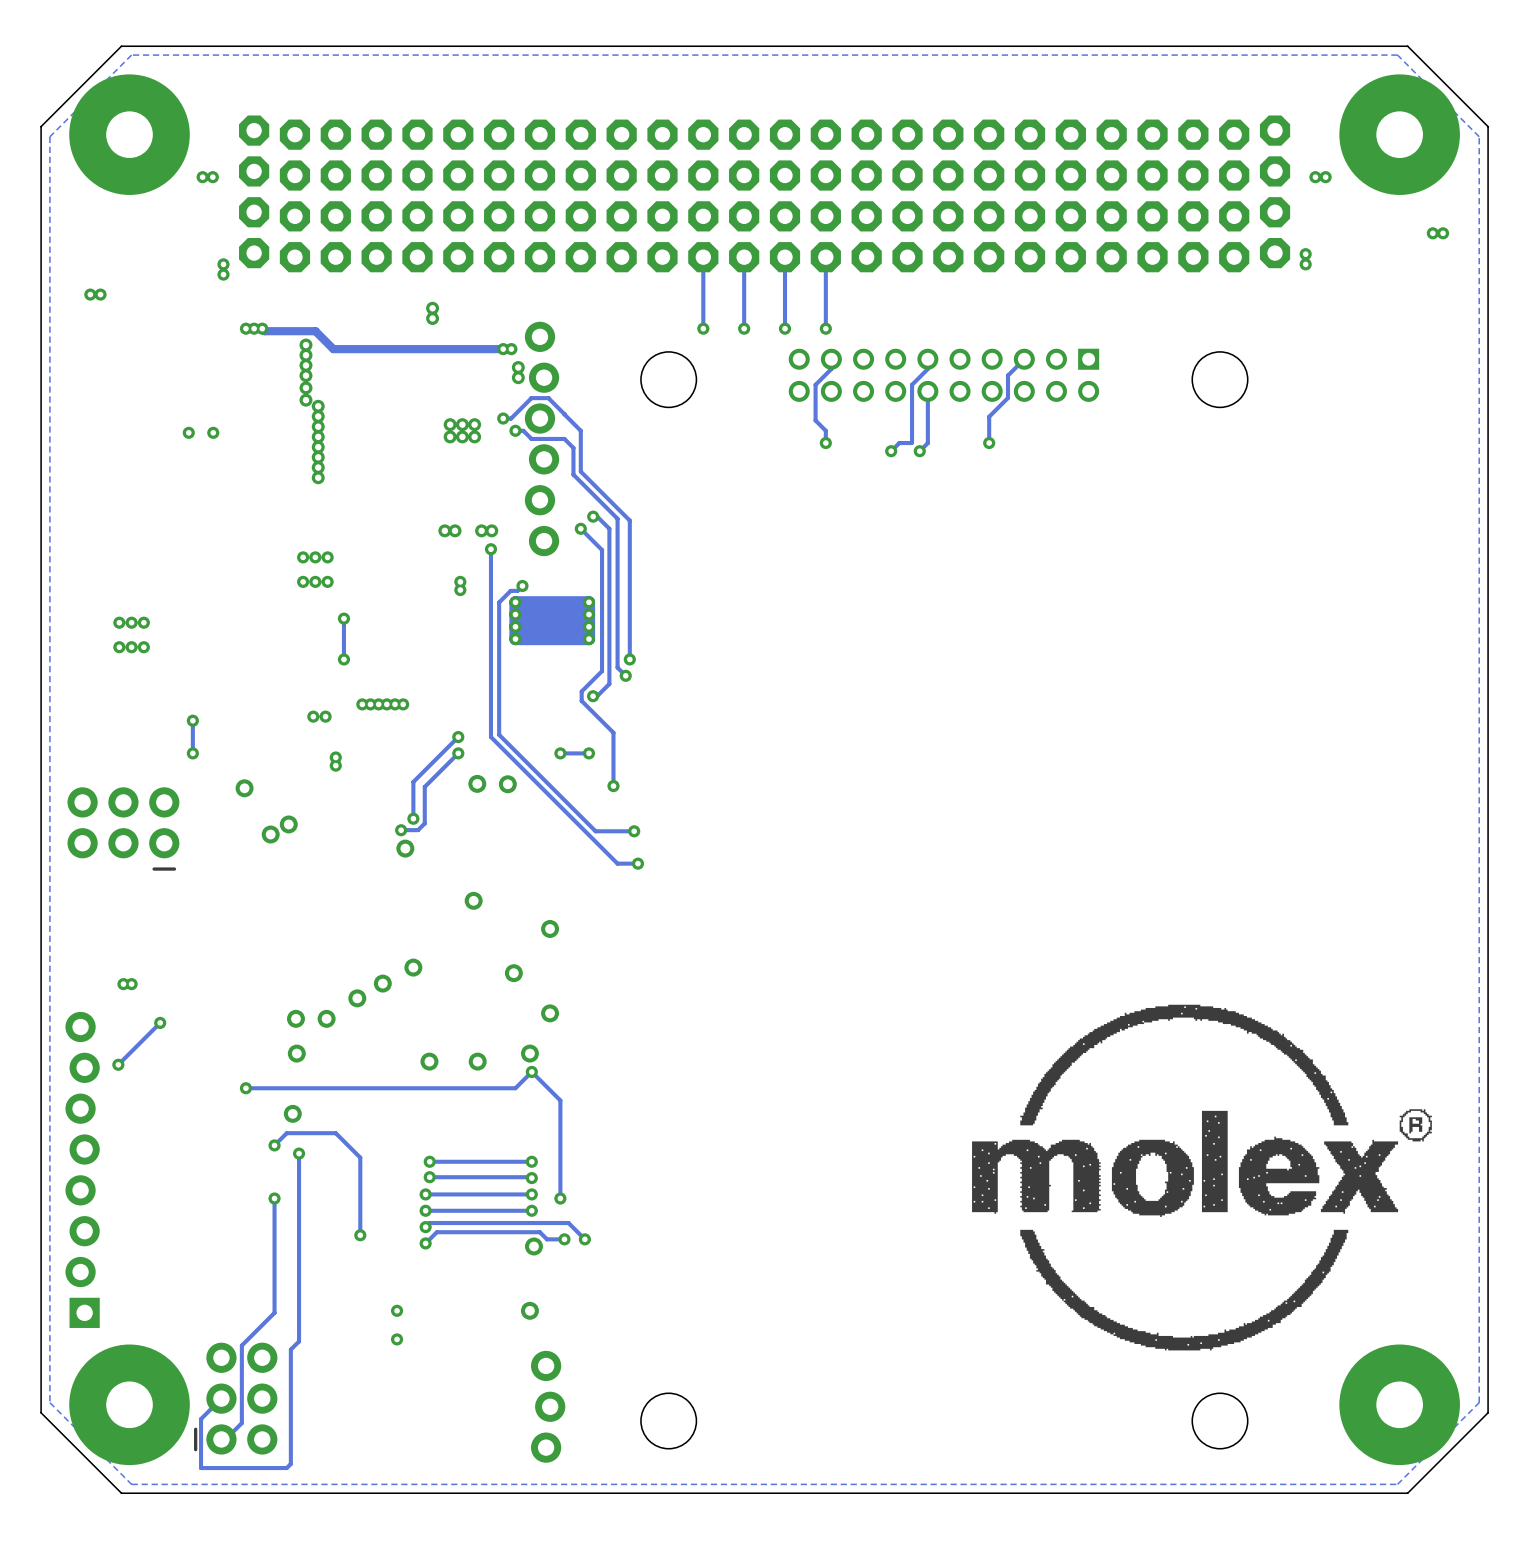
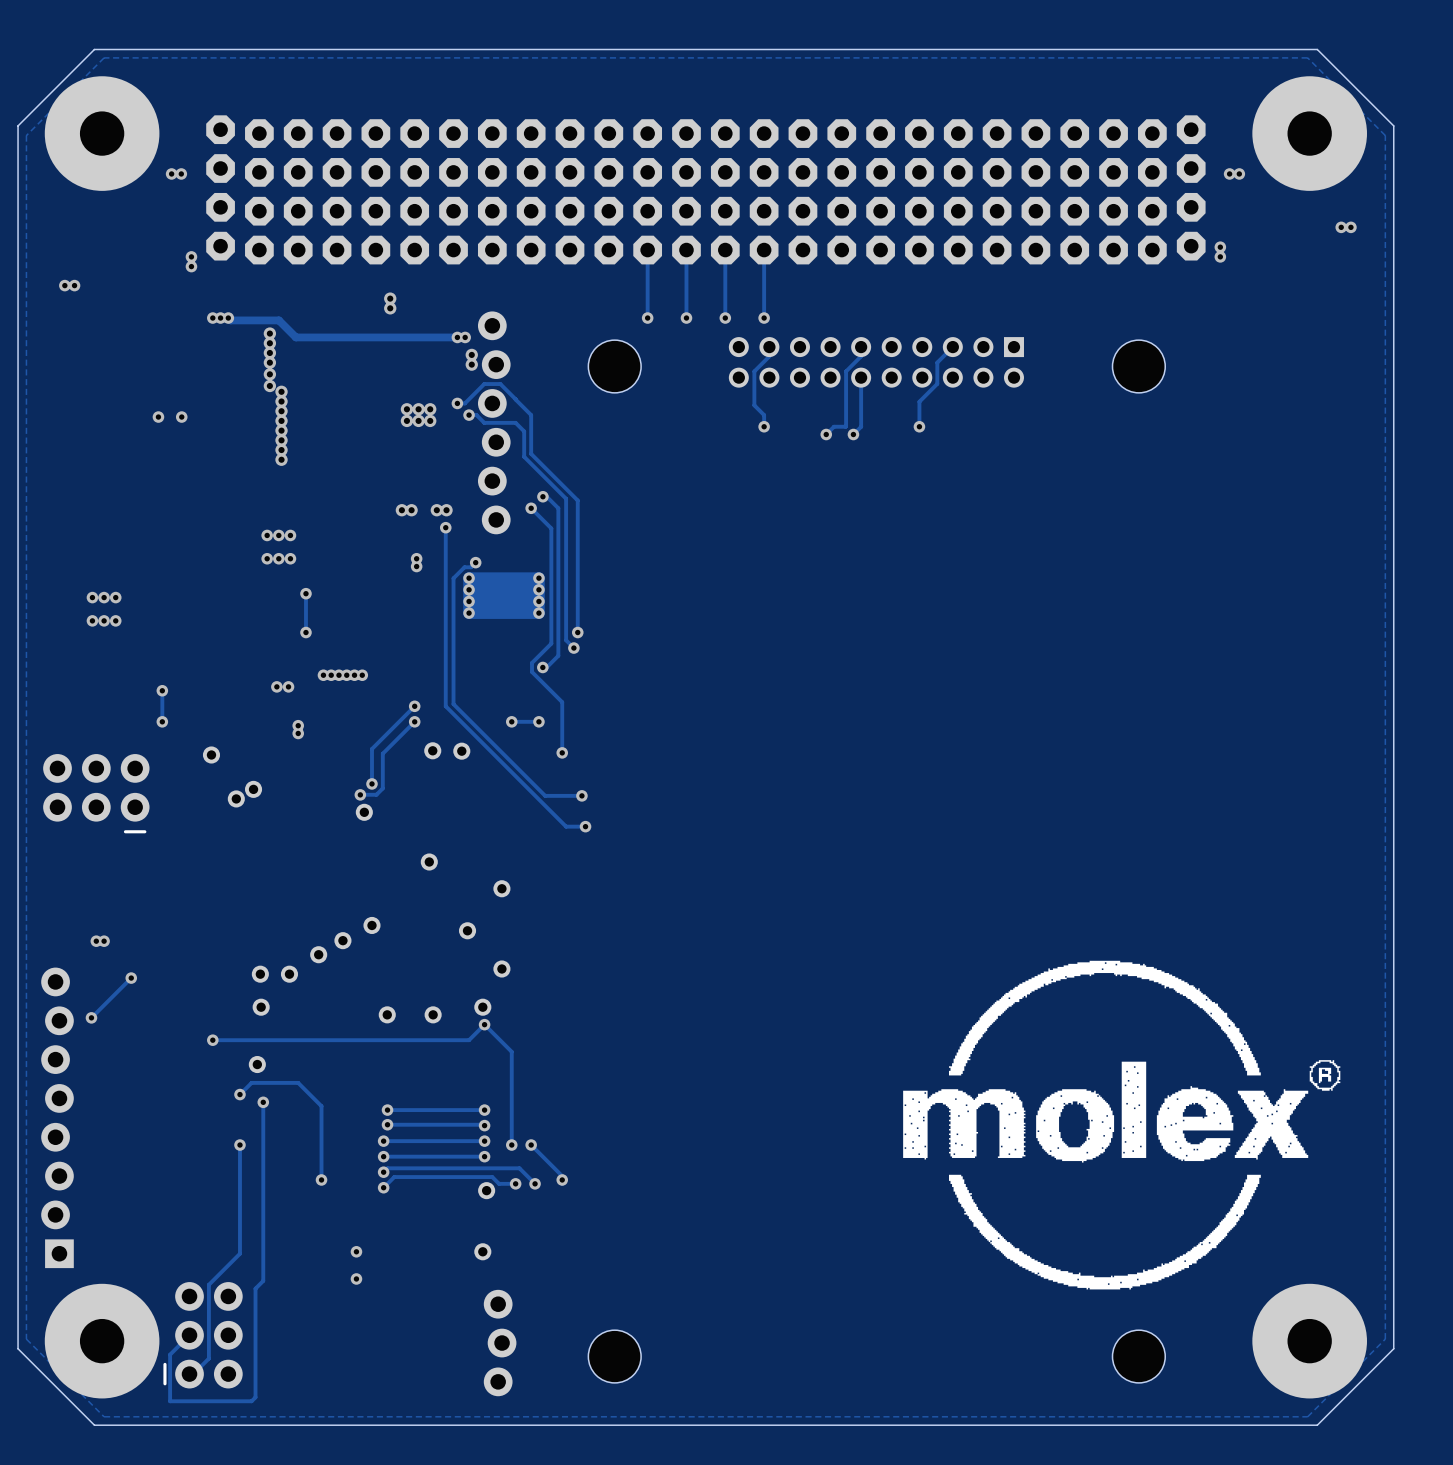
track: none -> (531, 1145) (562, 1176) (562, 1183)
via: none -> (531, 1145)
via: none -> (562, 1179)

